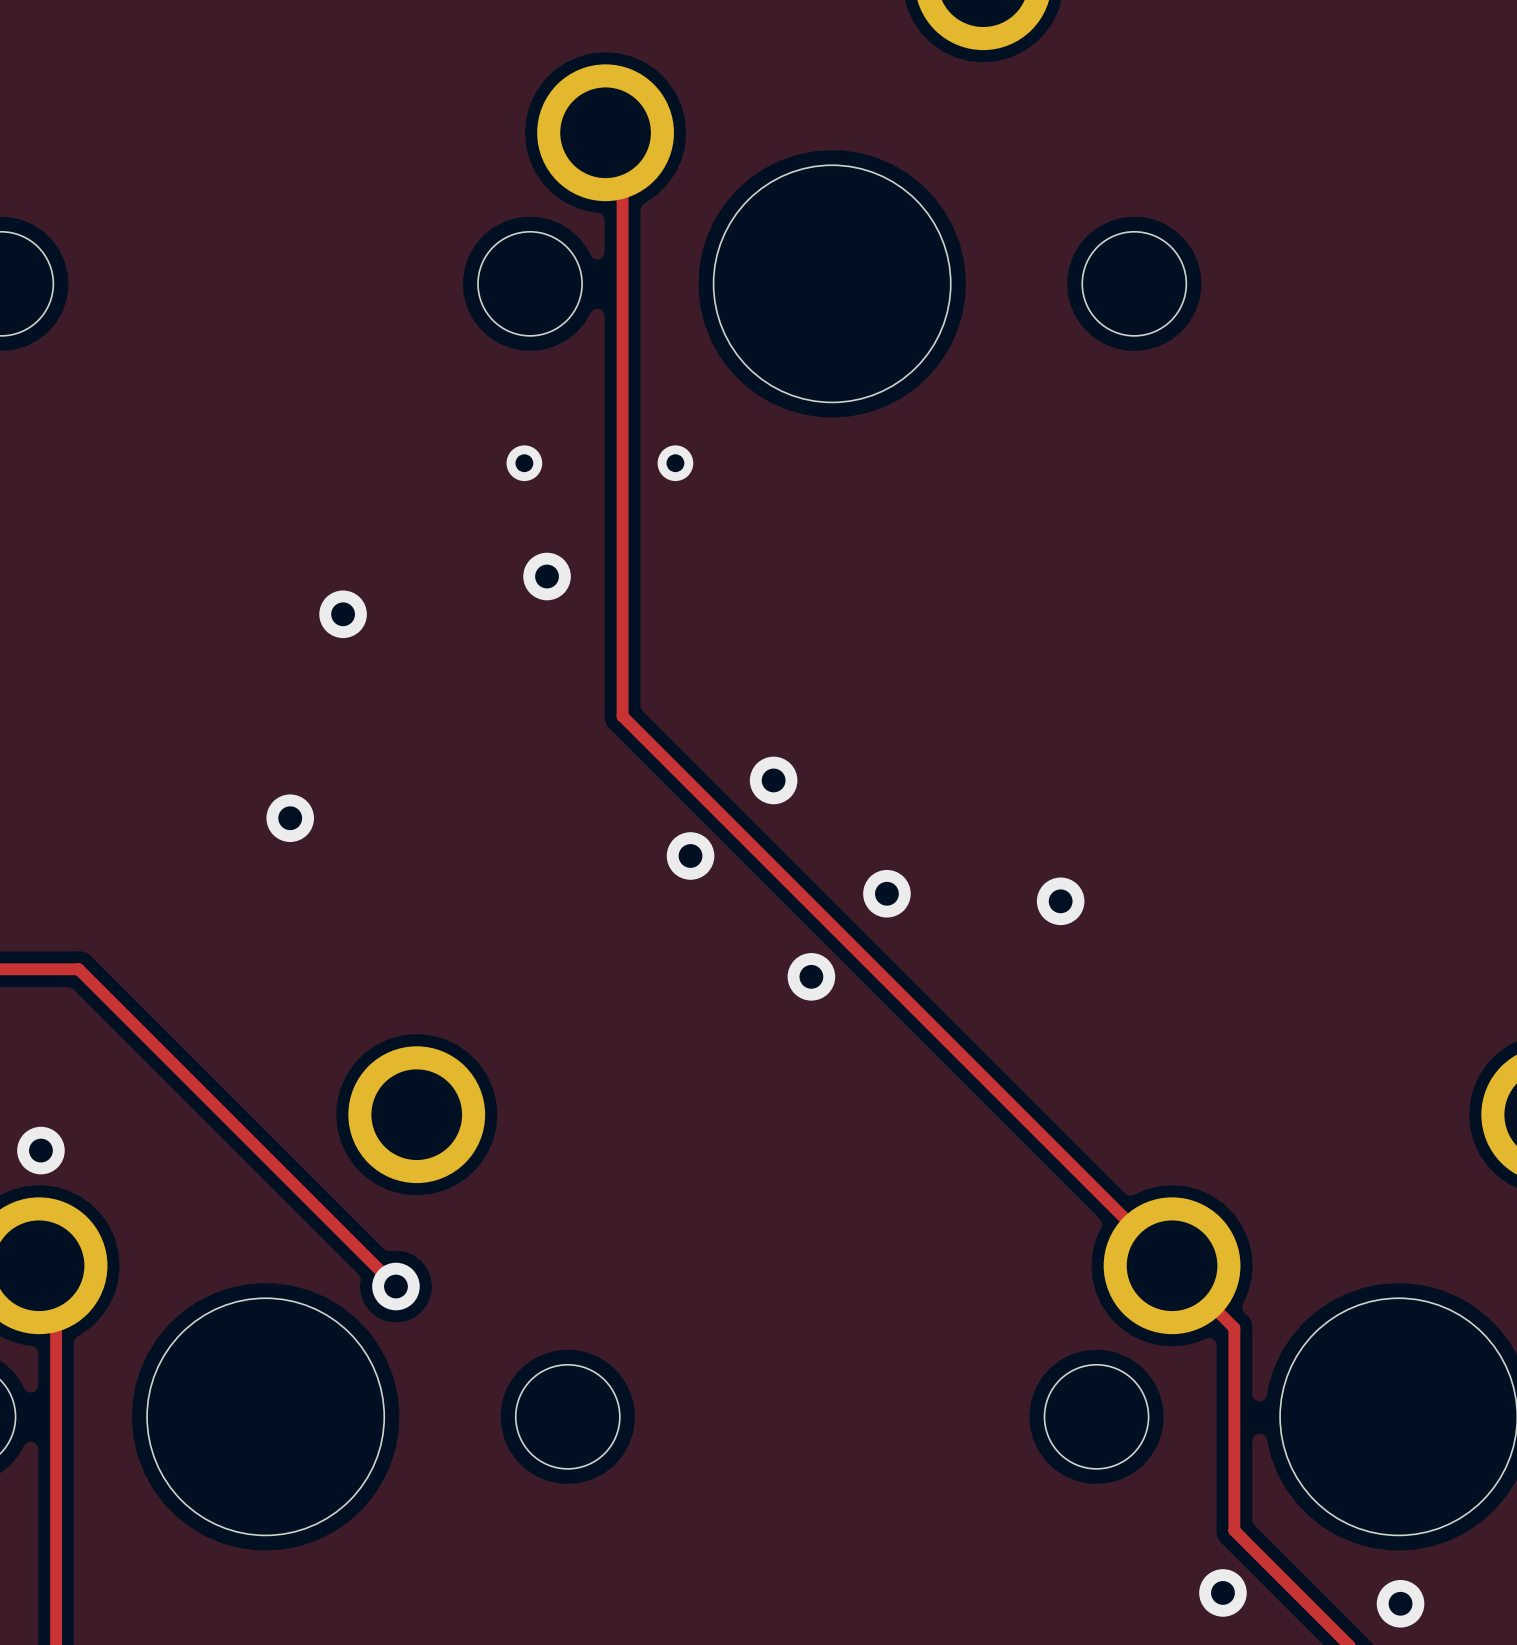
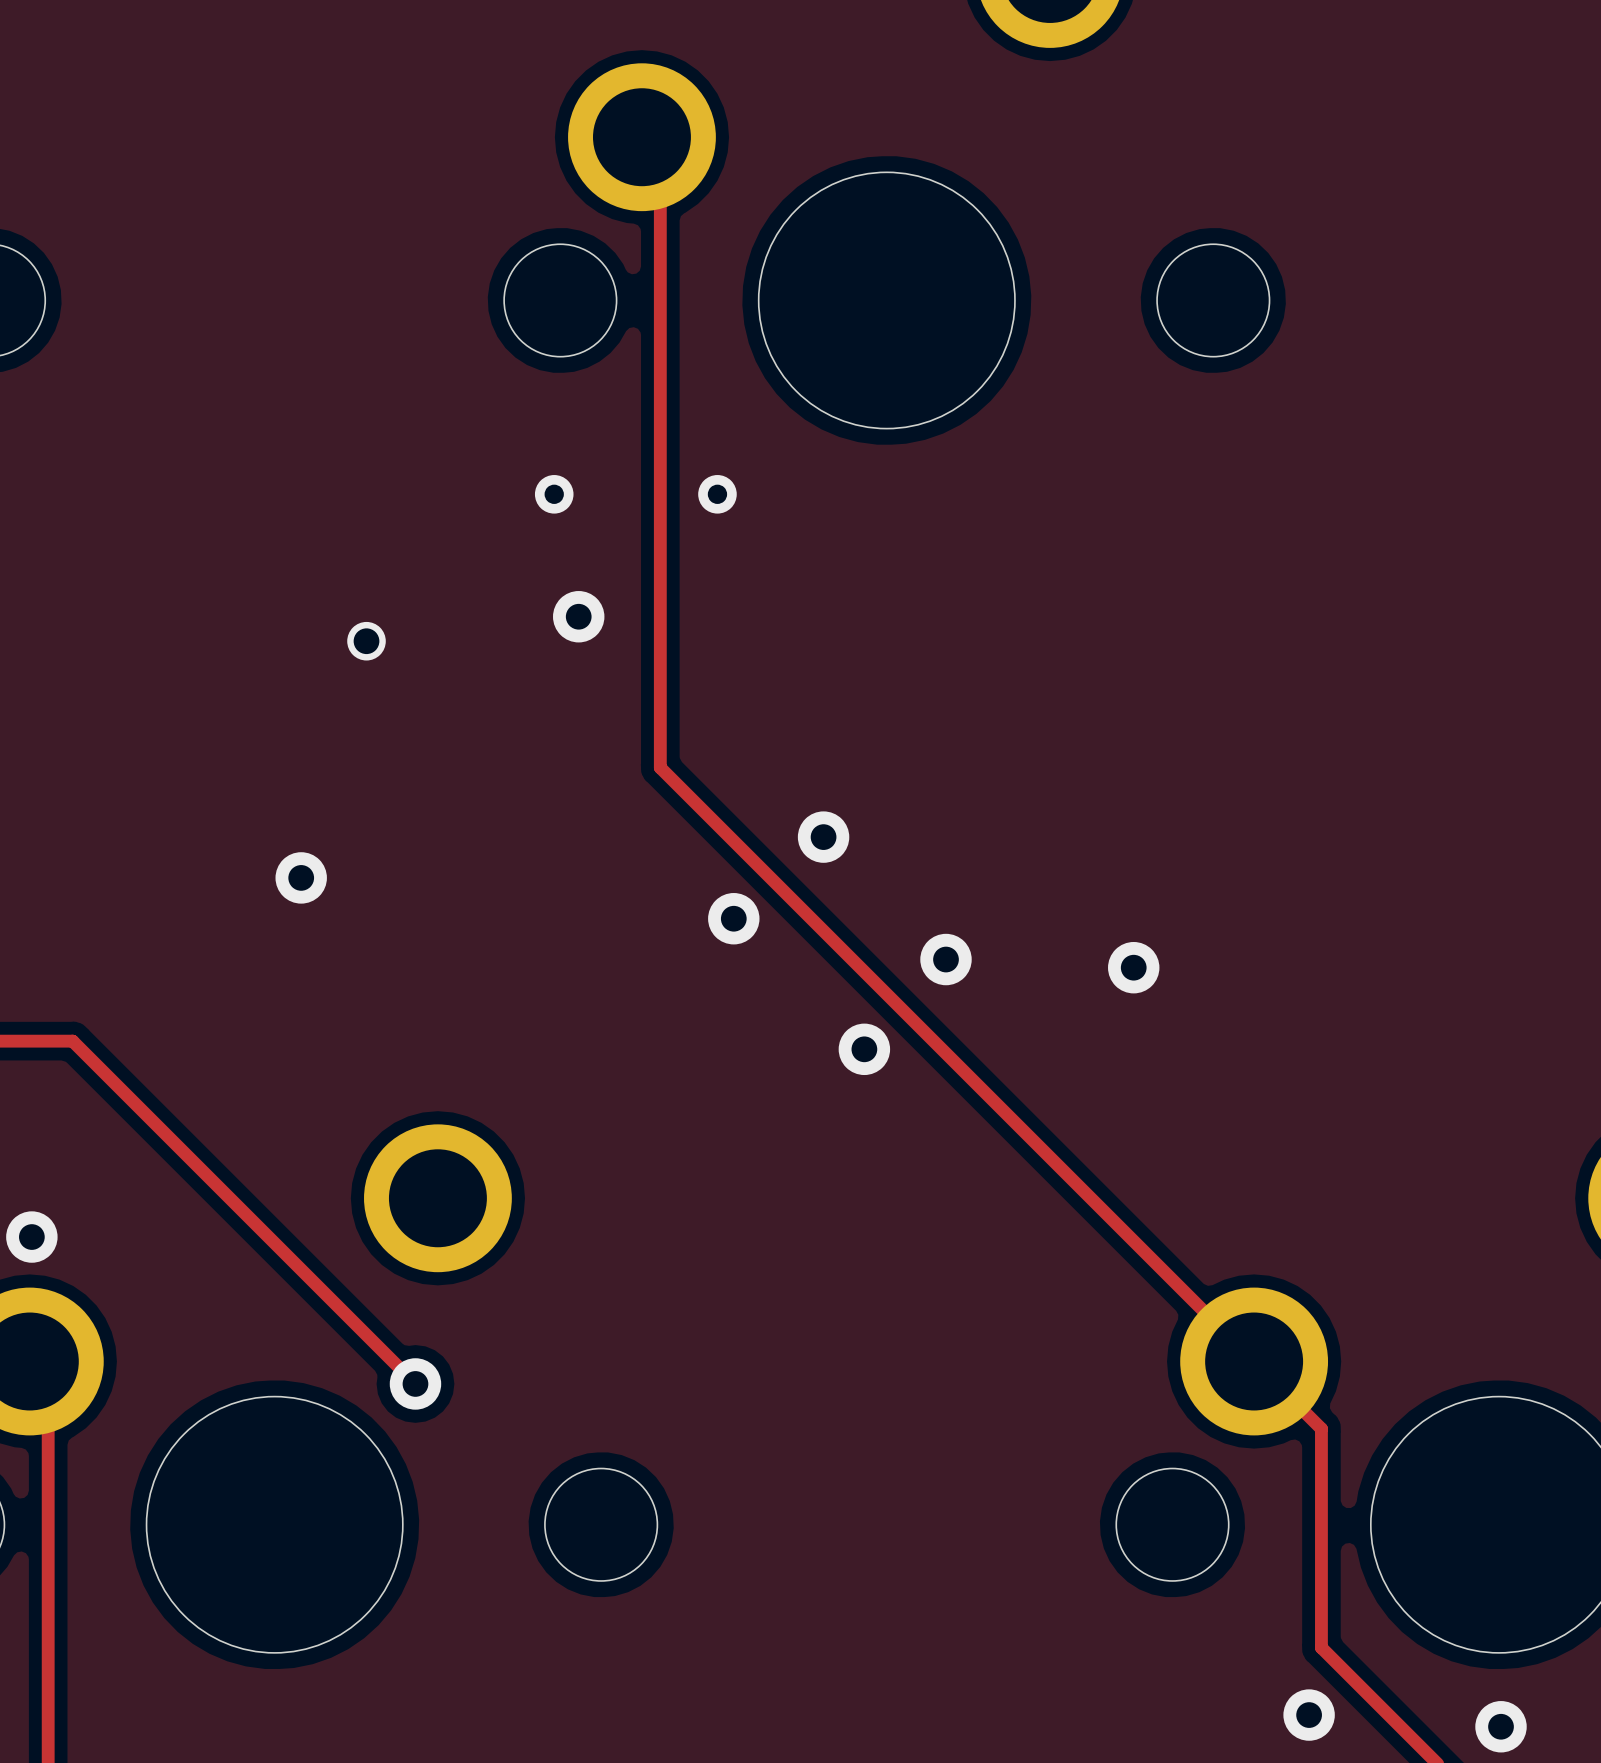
via size: [319, 590, 367, 639] -> [347, 621, 386, 661]

